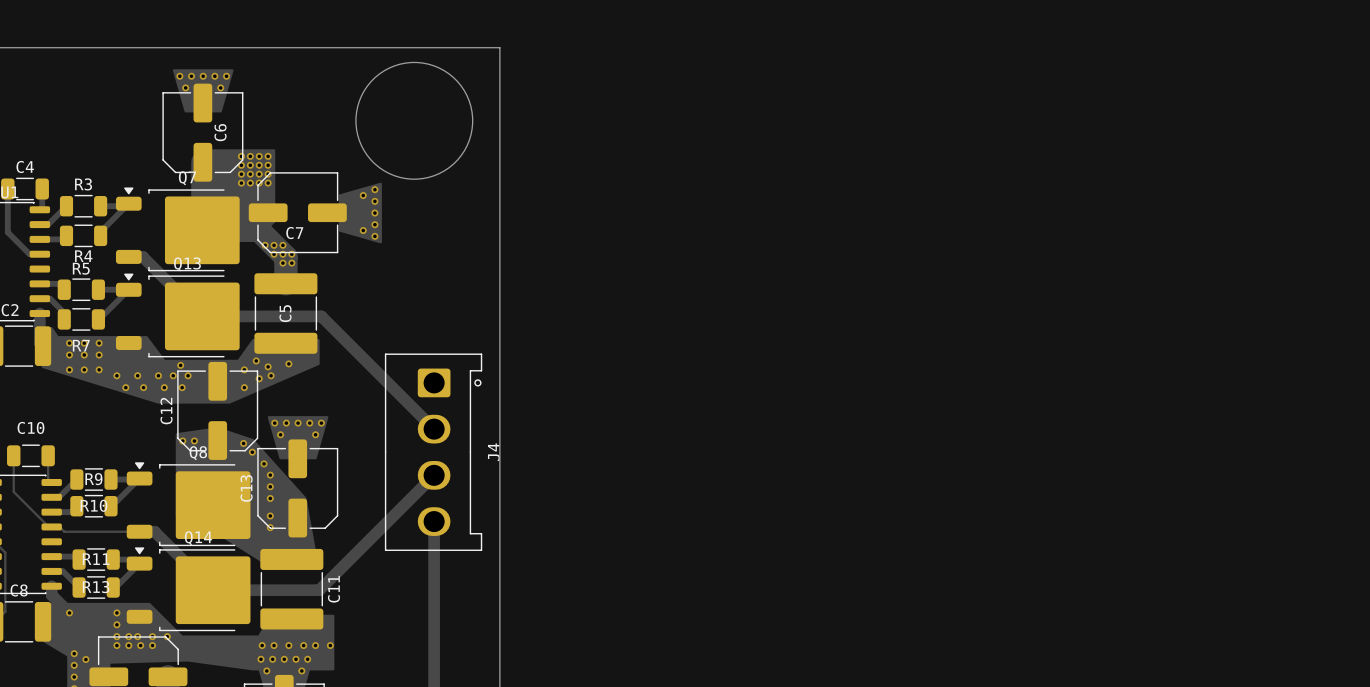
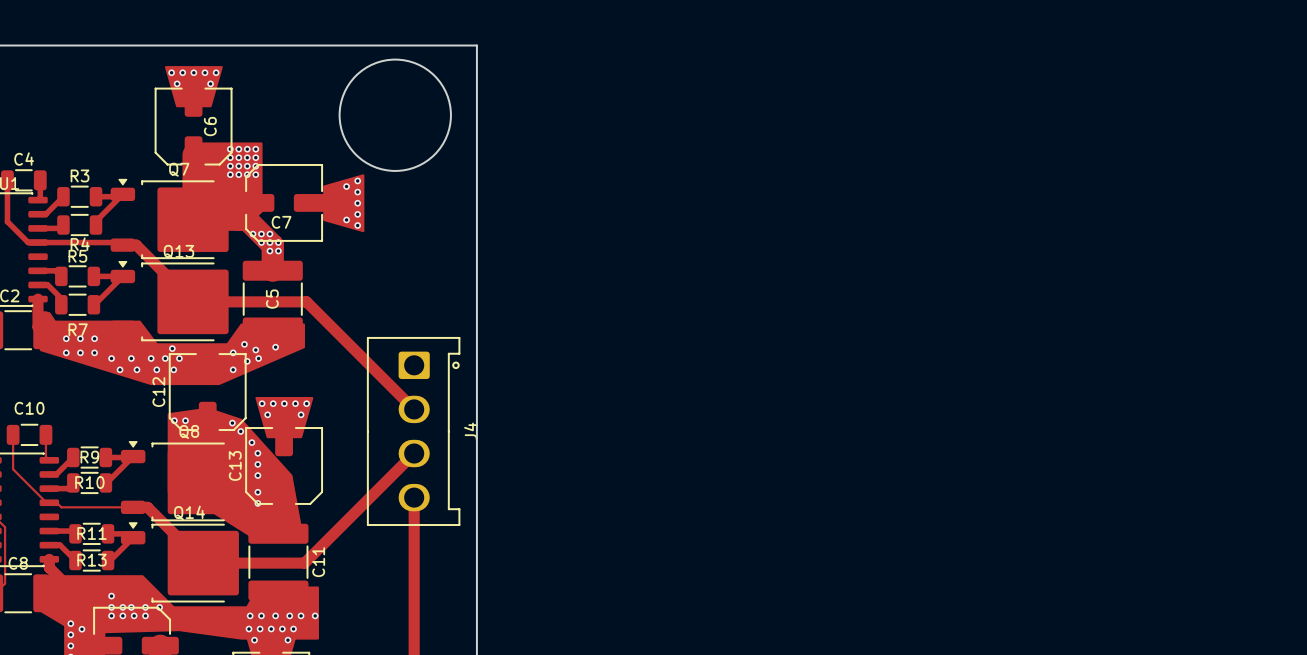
track: none -> (38, 242) (120, 242) (122, 245)
via: (69, 343) -> none
via: (84, 343) -> none
via: (99, 343) -> none
via: (69, 612) -> none
via: (116, 612) -> none

